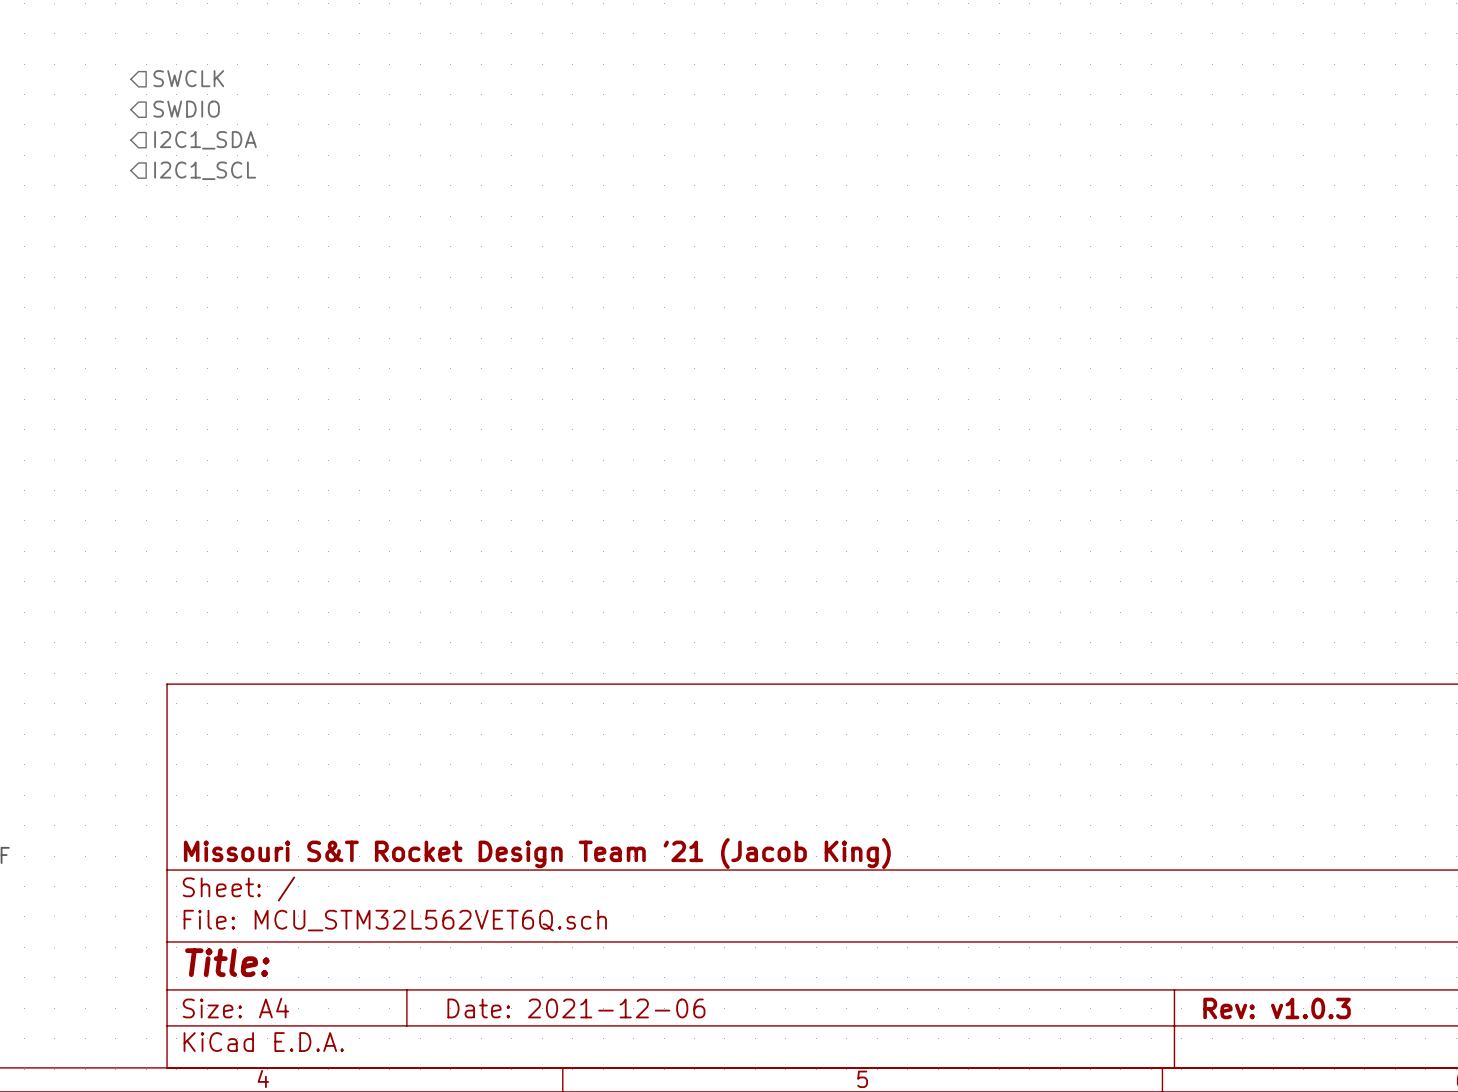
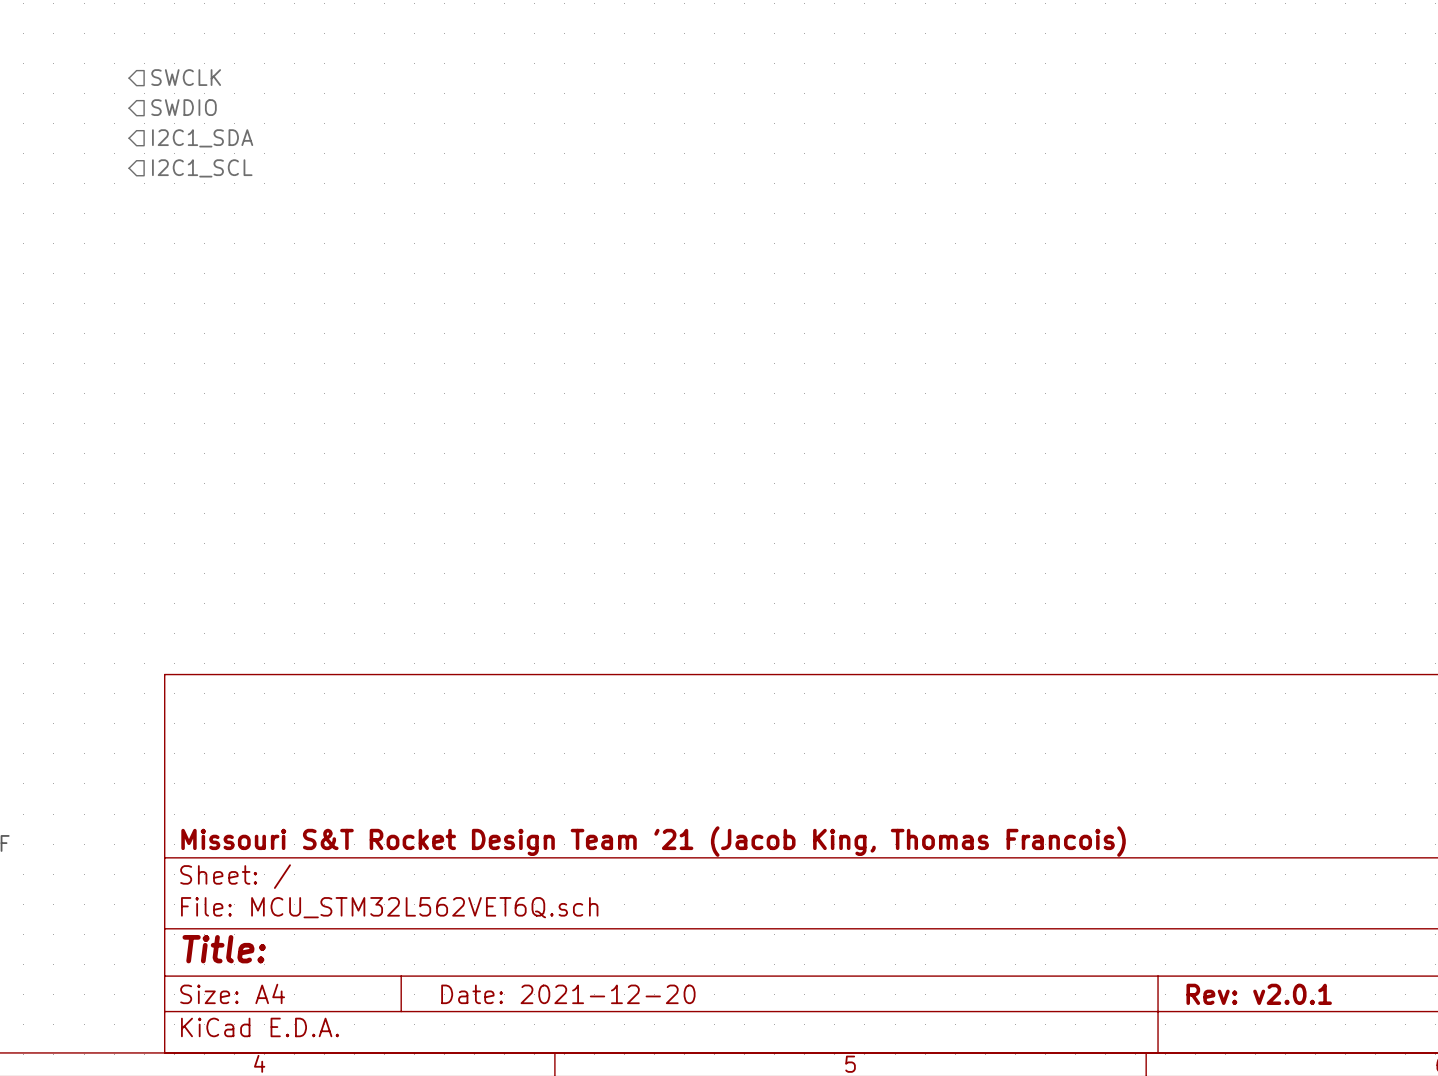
title block: Missouri S&T Rocket Design Team '21 (Jacob King) (537, 853) -> Missouri S&T Rocket Design Team '21 (Jacob King, Thomas Francois) (653, 841)
title block: Date: 2021-12-06 (576, 1008) -> Date: 2021-12-20 (568, 994)
title block: Rev: v1.0.3 (1277, 1008) -> Rev: v2.0.1 (1259, 994)

